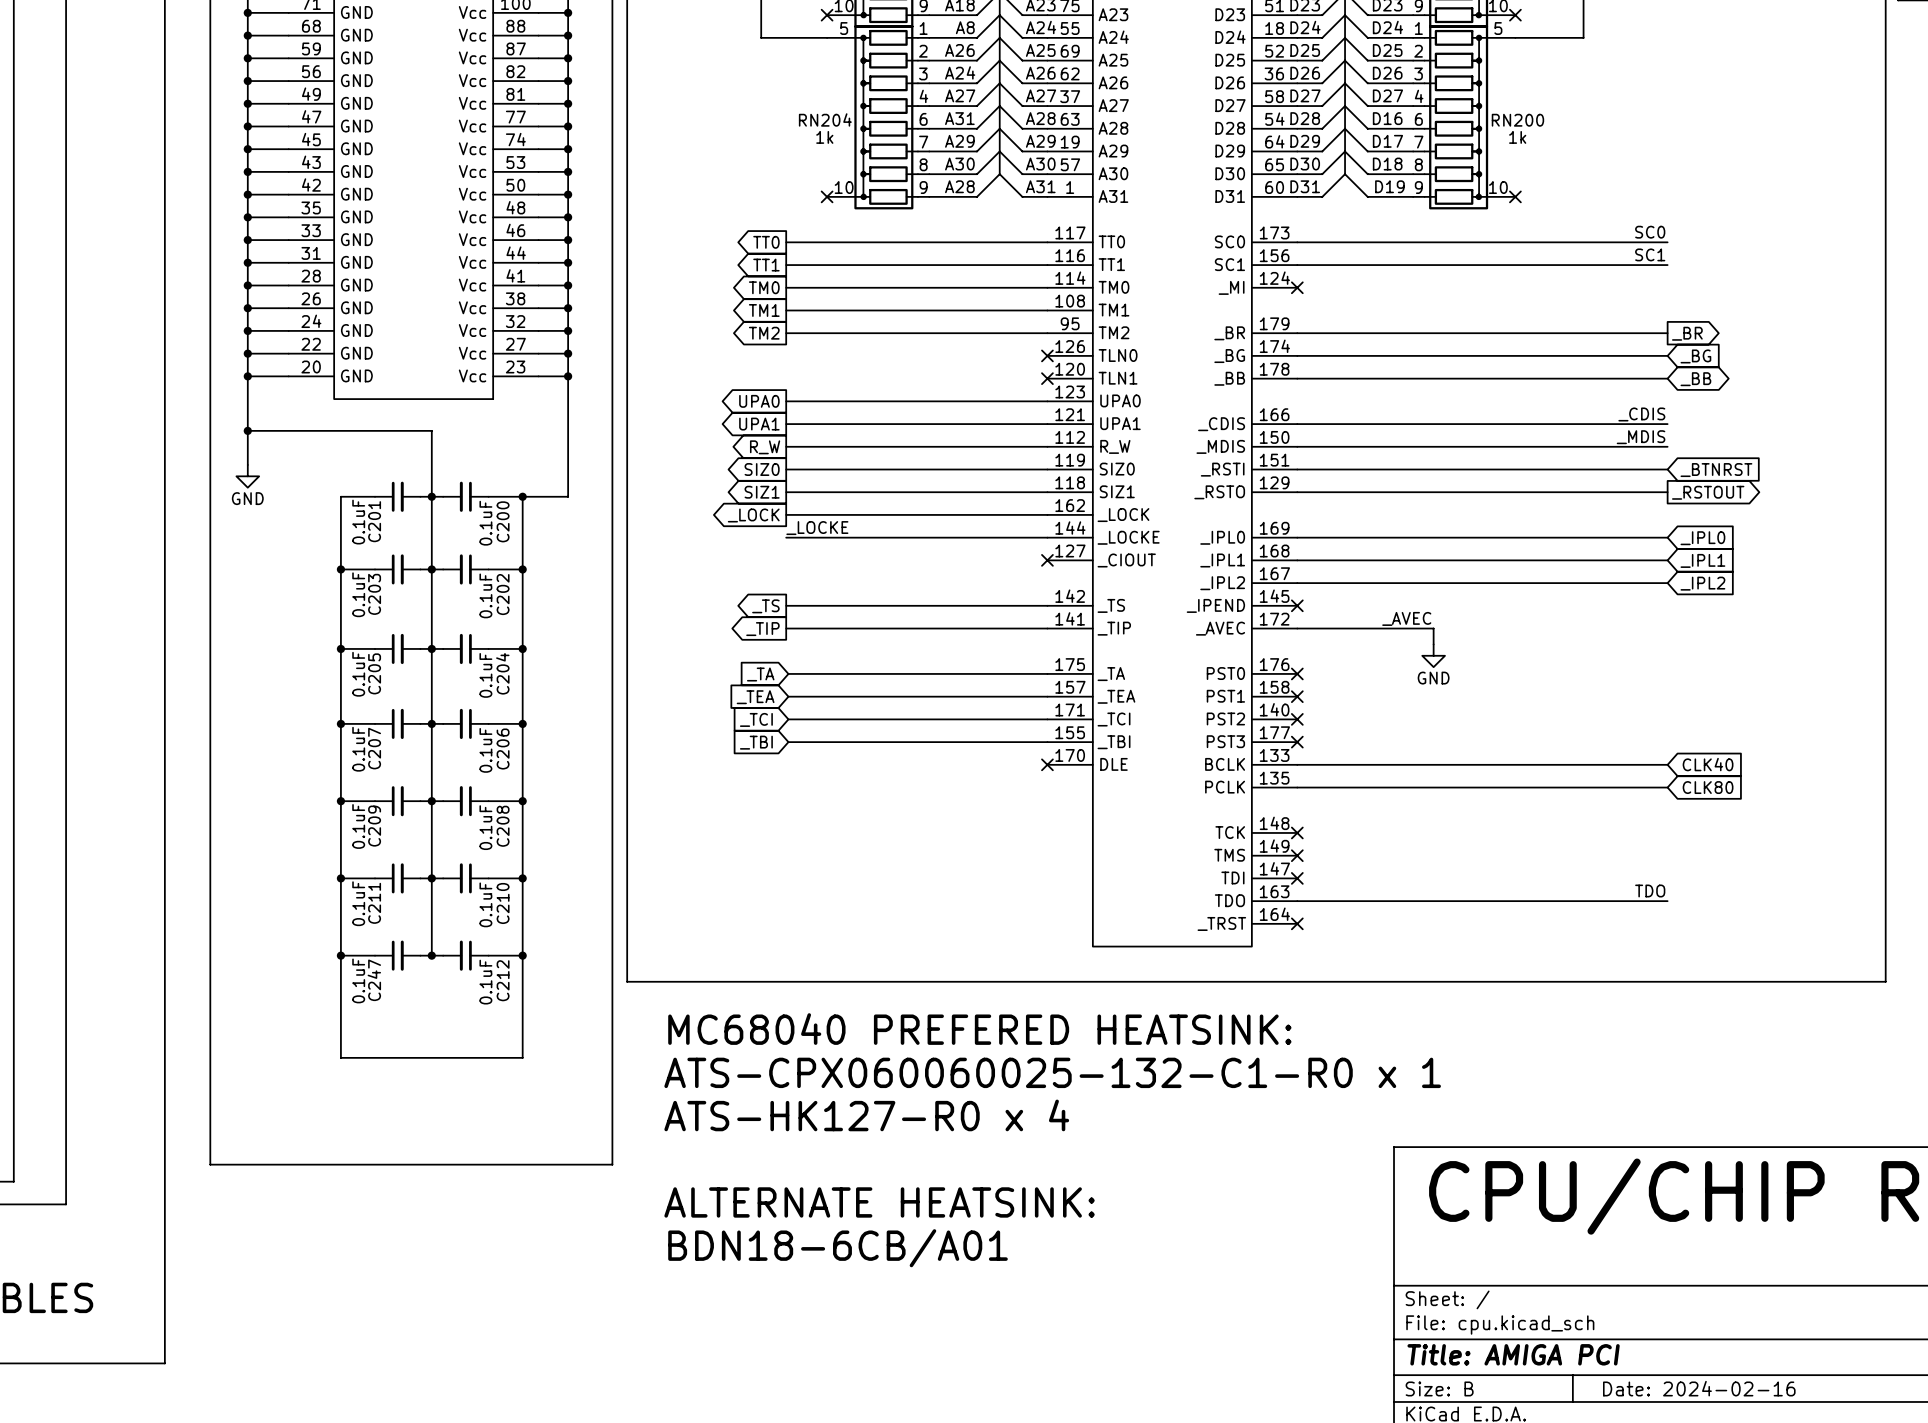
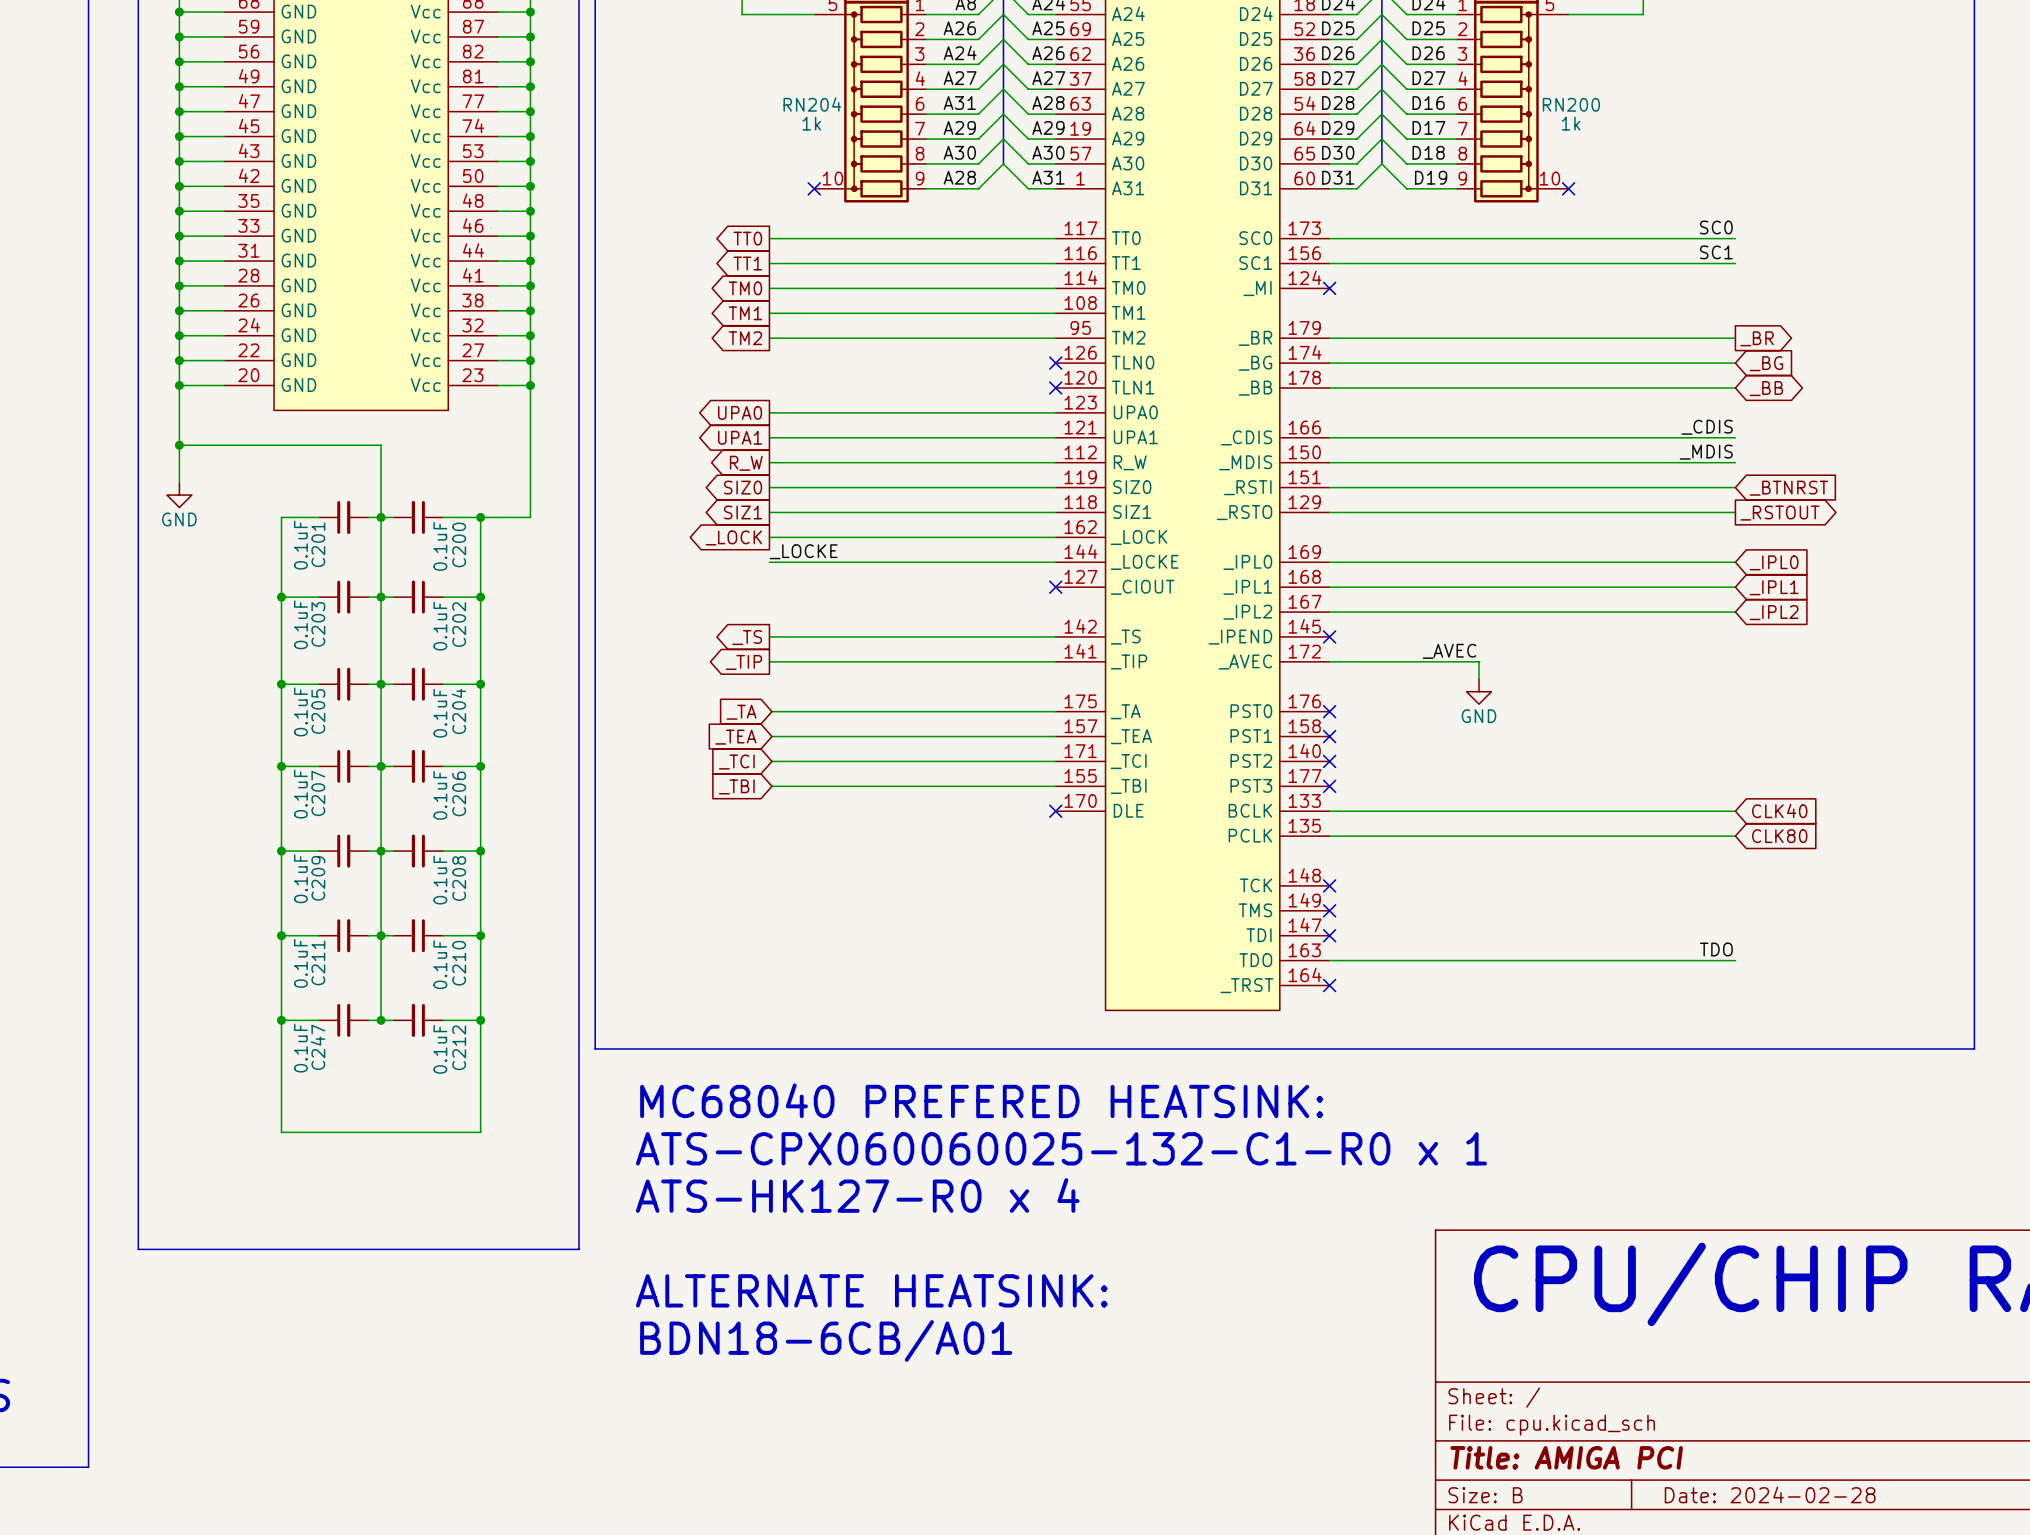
title block: Date: 2024-02-16 (1699, 1388) -> Date: 2024-02-28 (1770, 1494)

